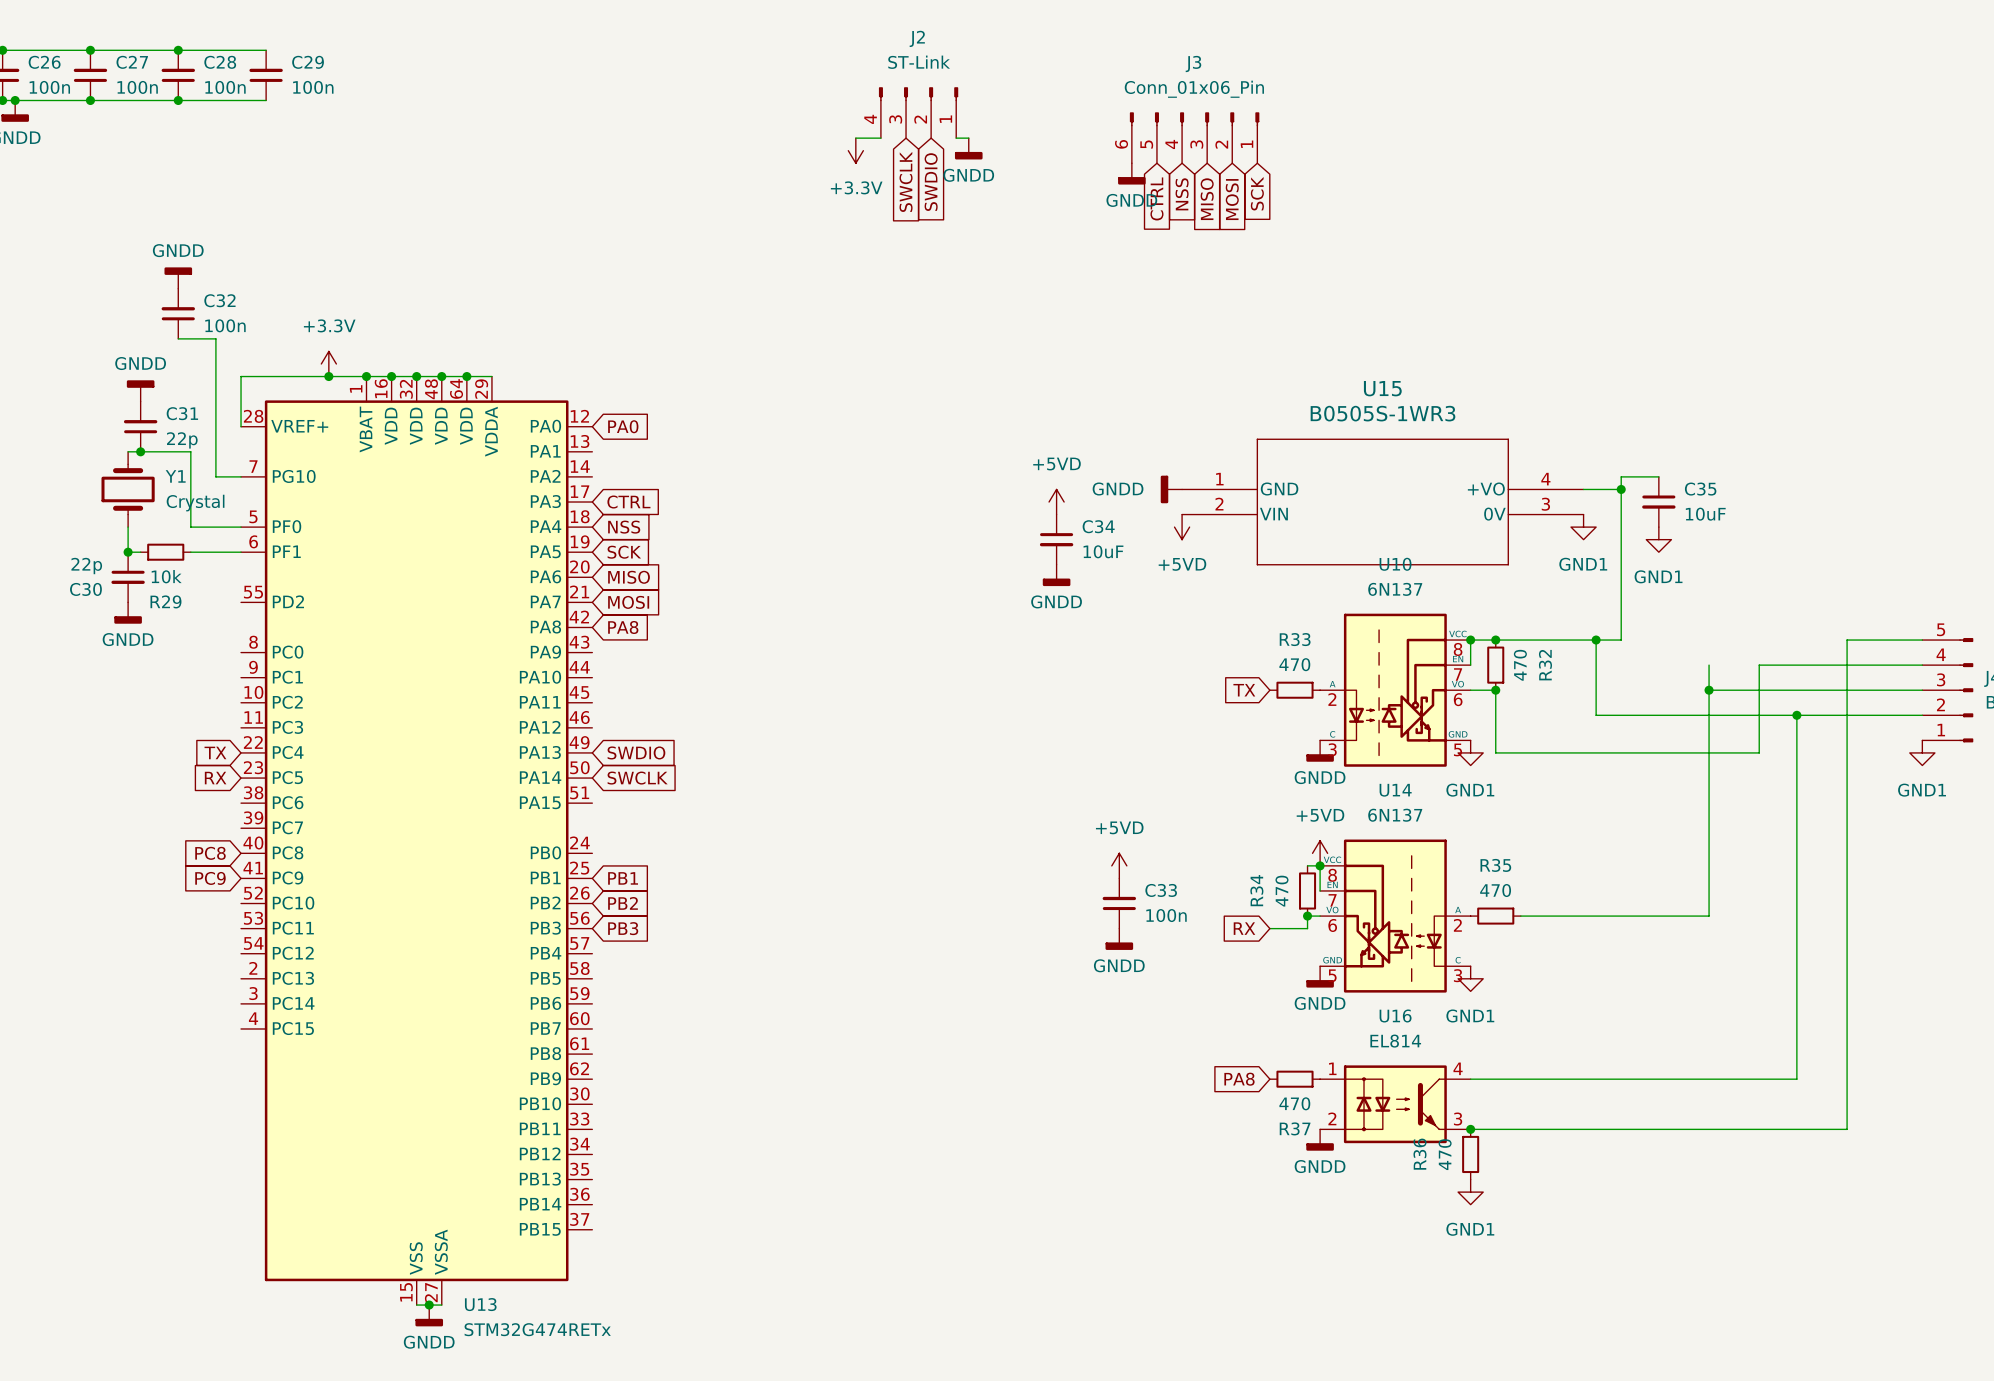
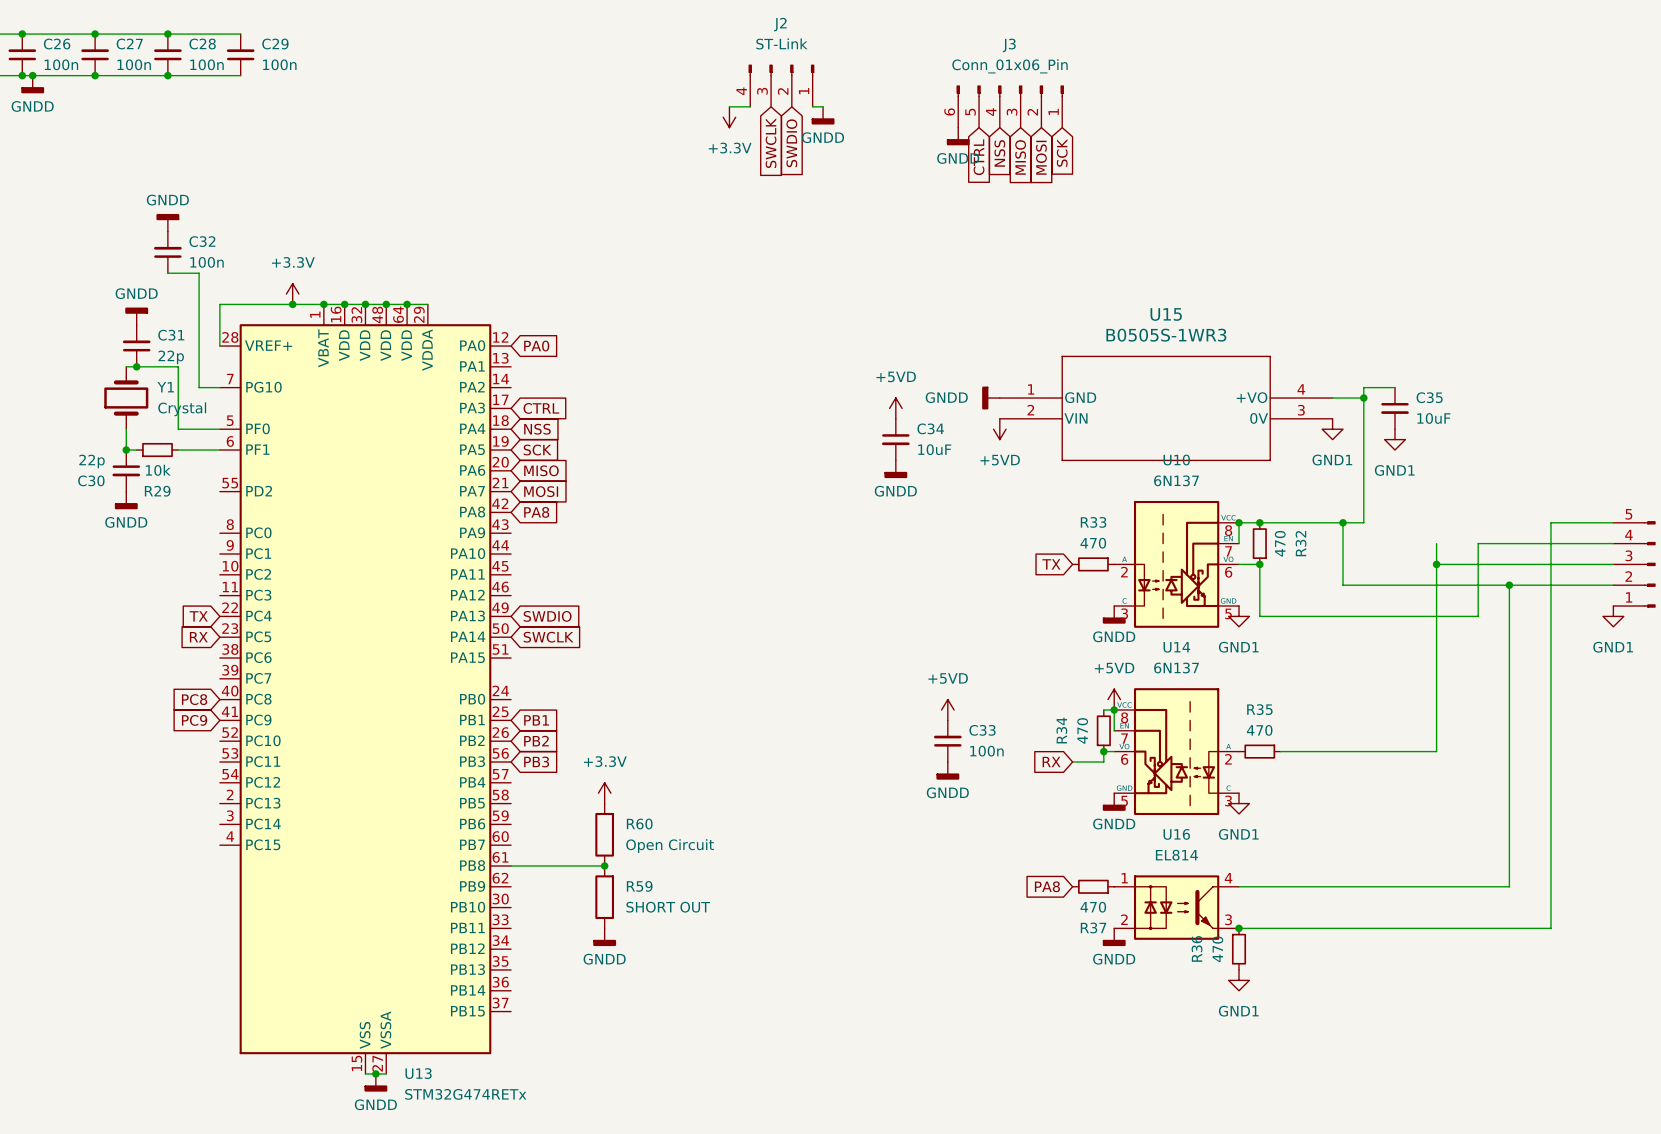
power symbol: none -> +3.3V (604, 793)
R60: none -> Open Circuit (604, 834)
wire: none -> (511, 865) (604, 865)
junction: none -> (604, 865)
R59: none -> SHORT OUT (604, 897)
power symbol: none -> GNDD (604, 937)

